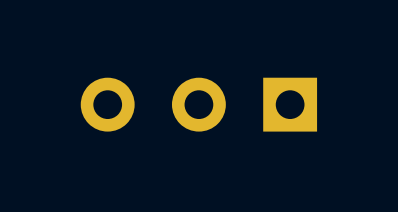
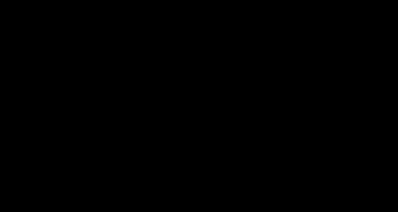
part: (198, 104) -> none

